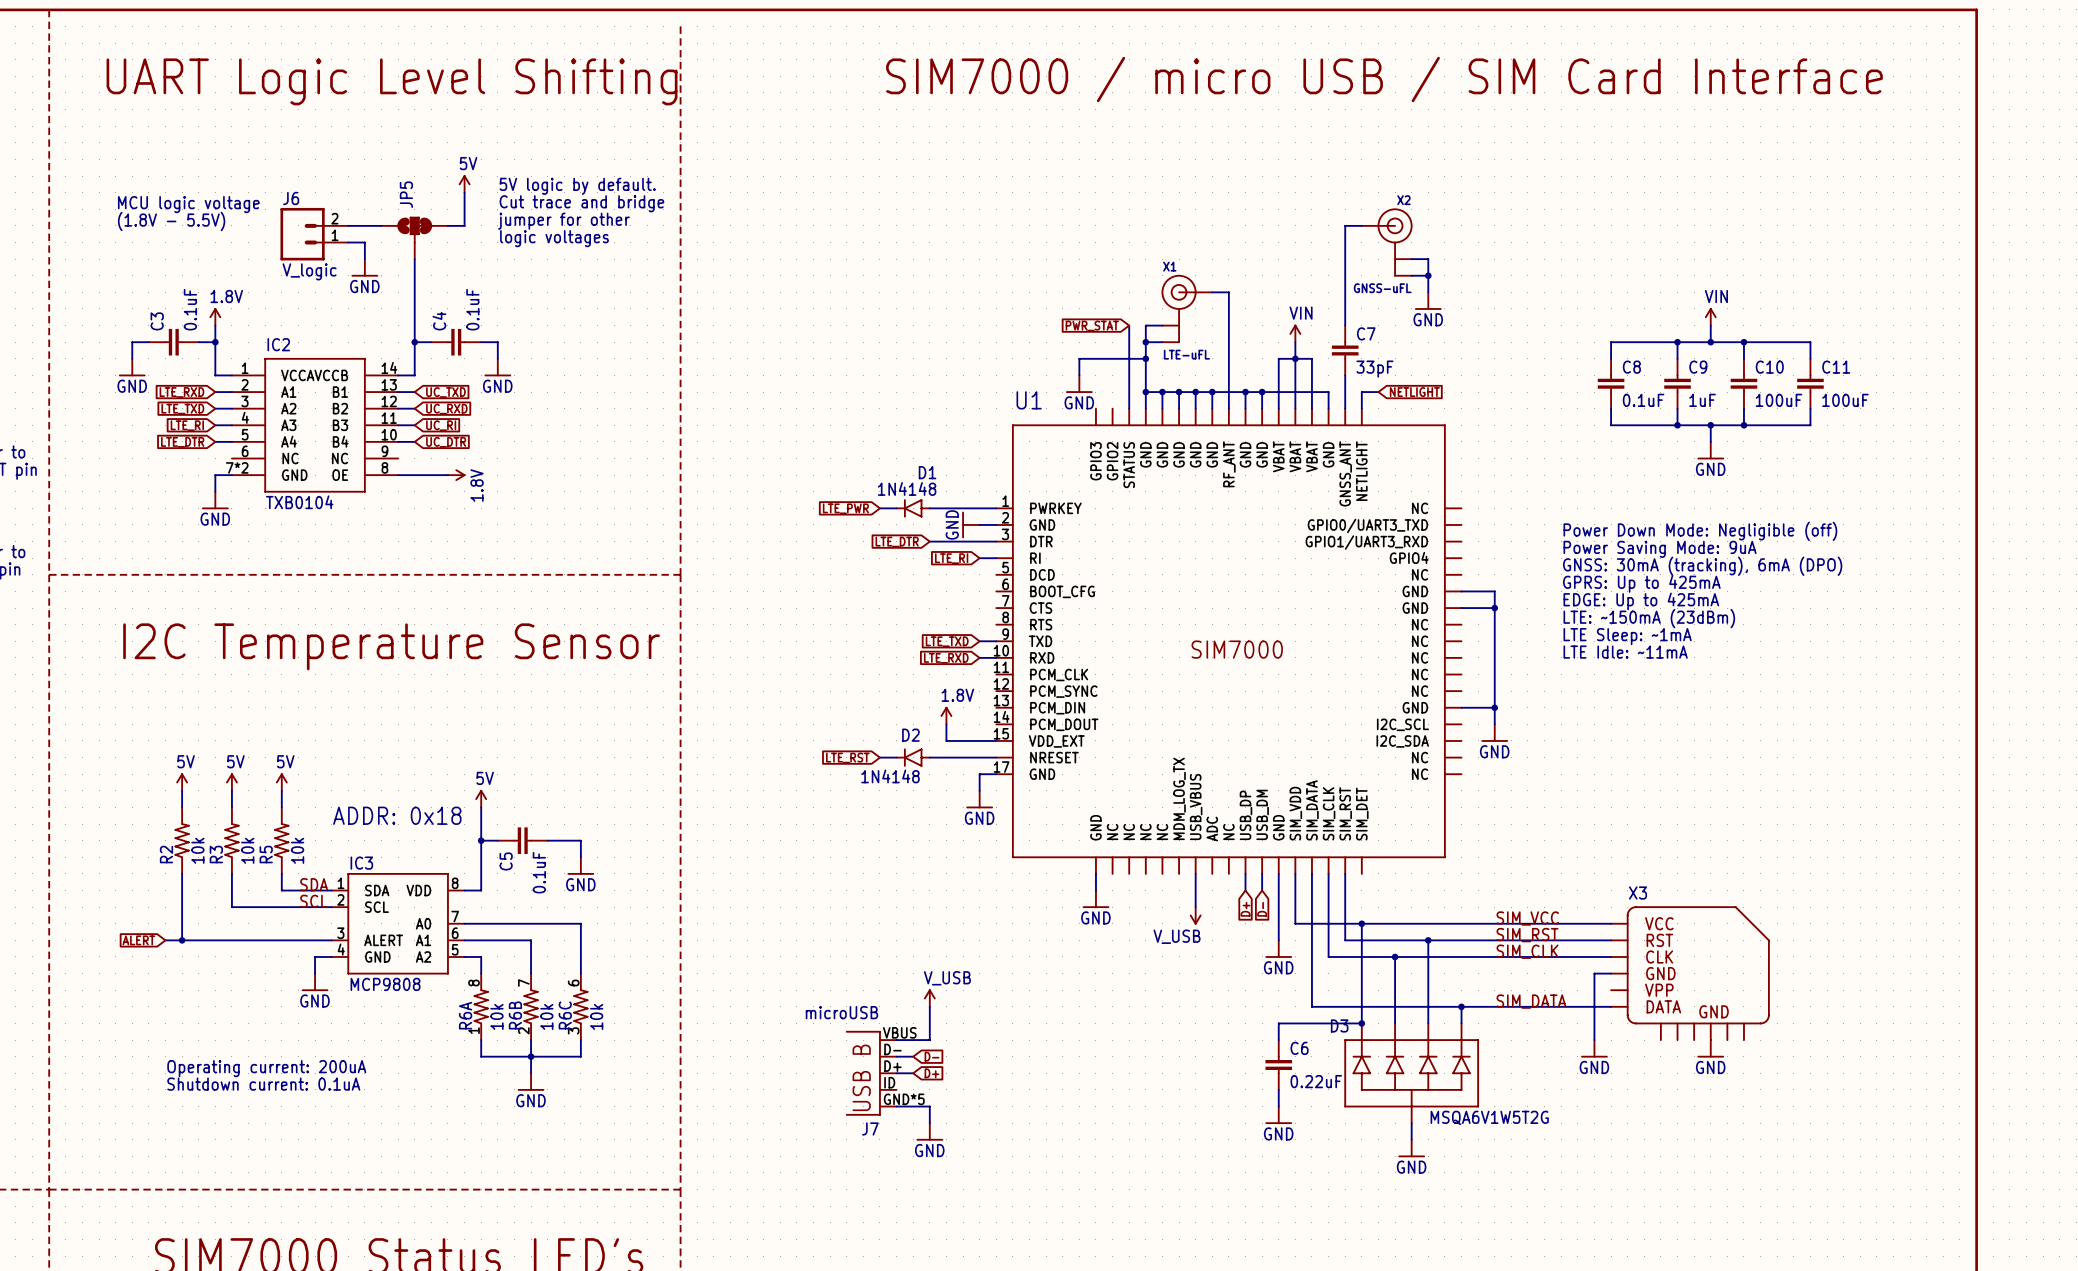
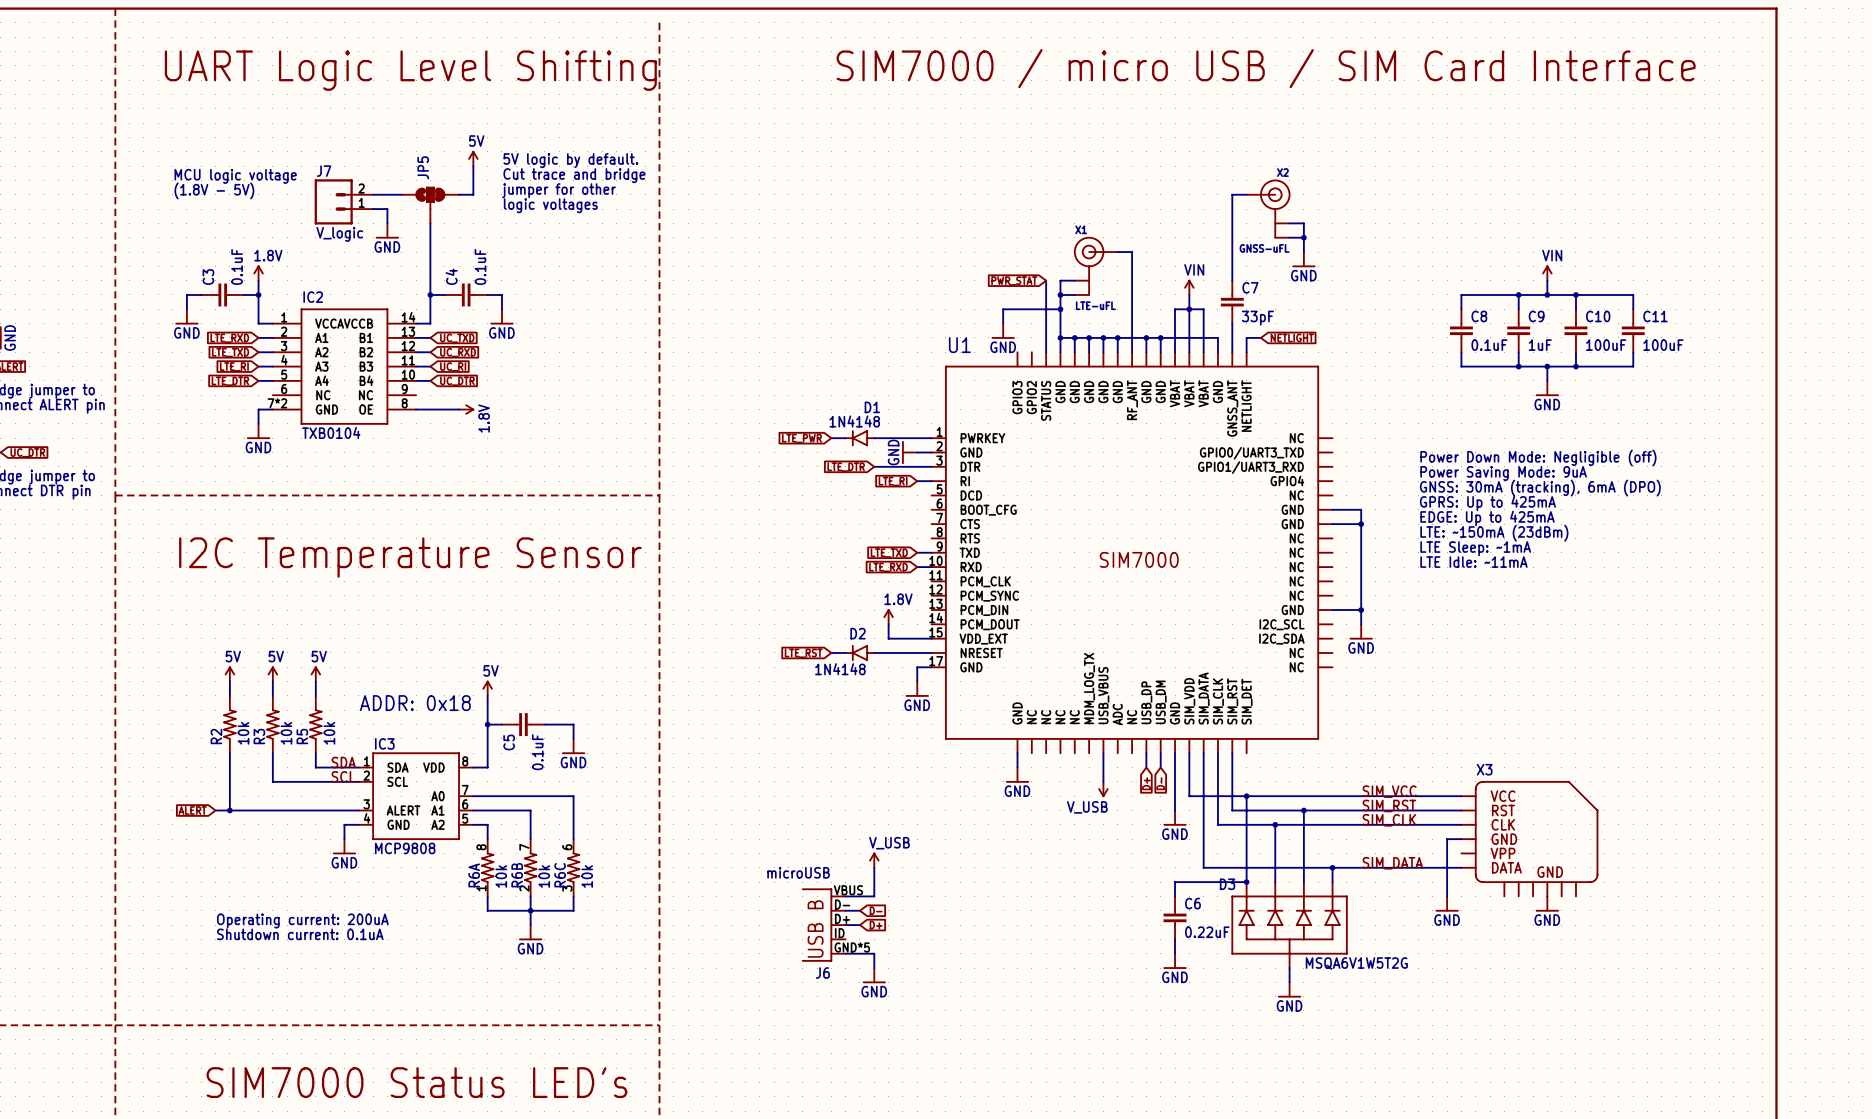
J6 name: J6 (291, 198) -> J7 (324, 171)
text: (1.8V - 5.5V) (171, 221) -> (1.8V - 5V) (214, 190)
J7 name: J7 (870, 1128) -> J6 (822, 973)

